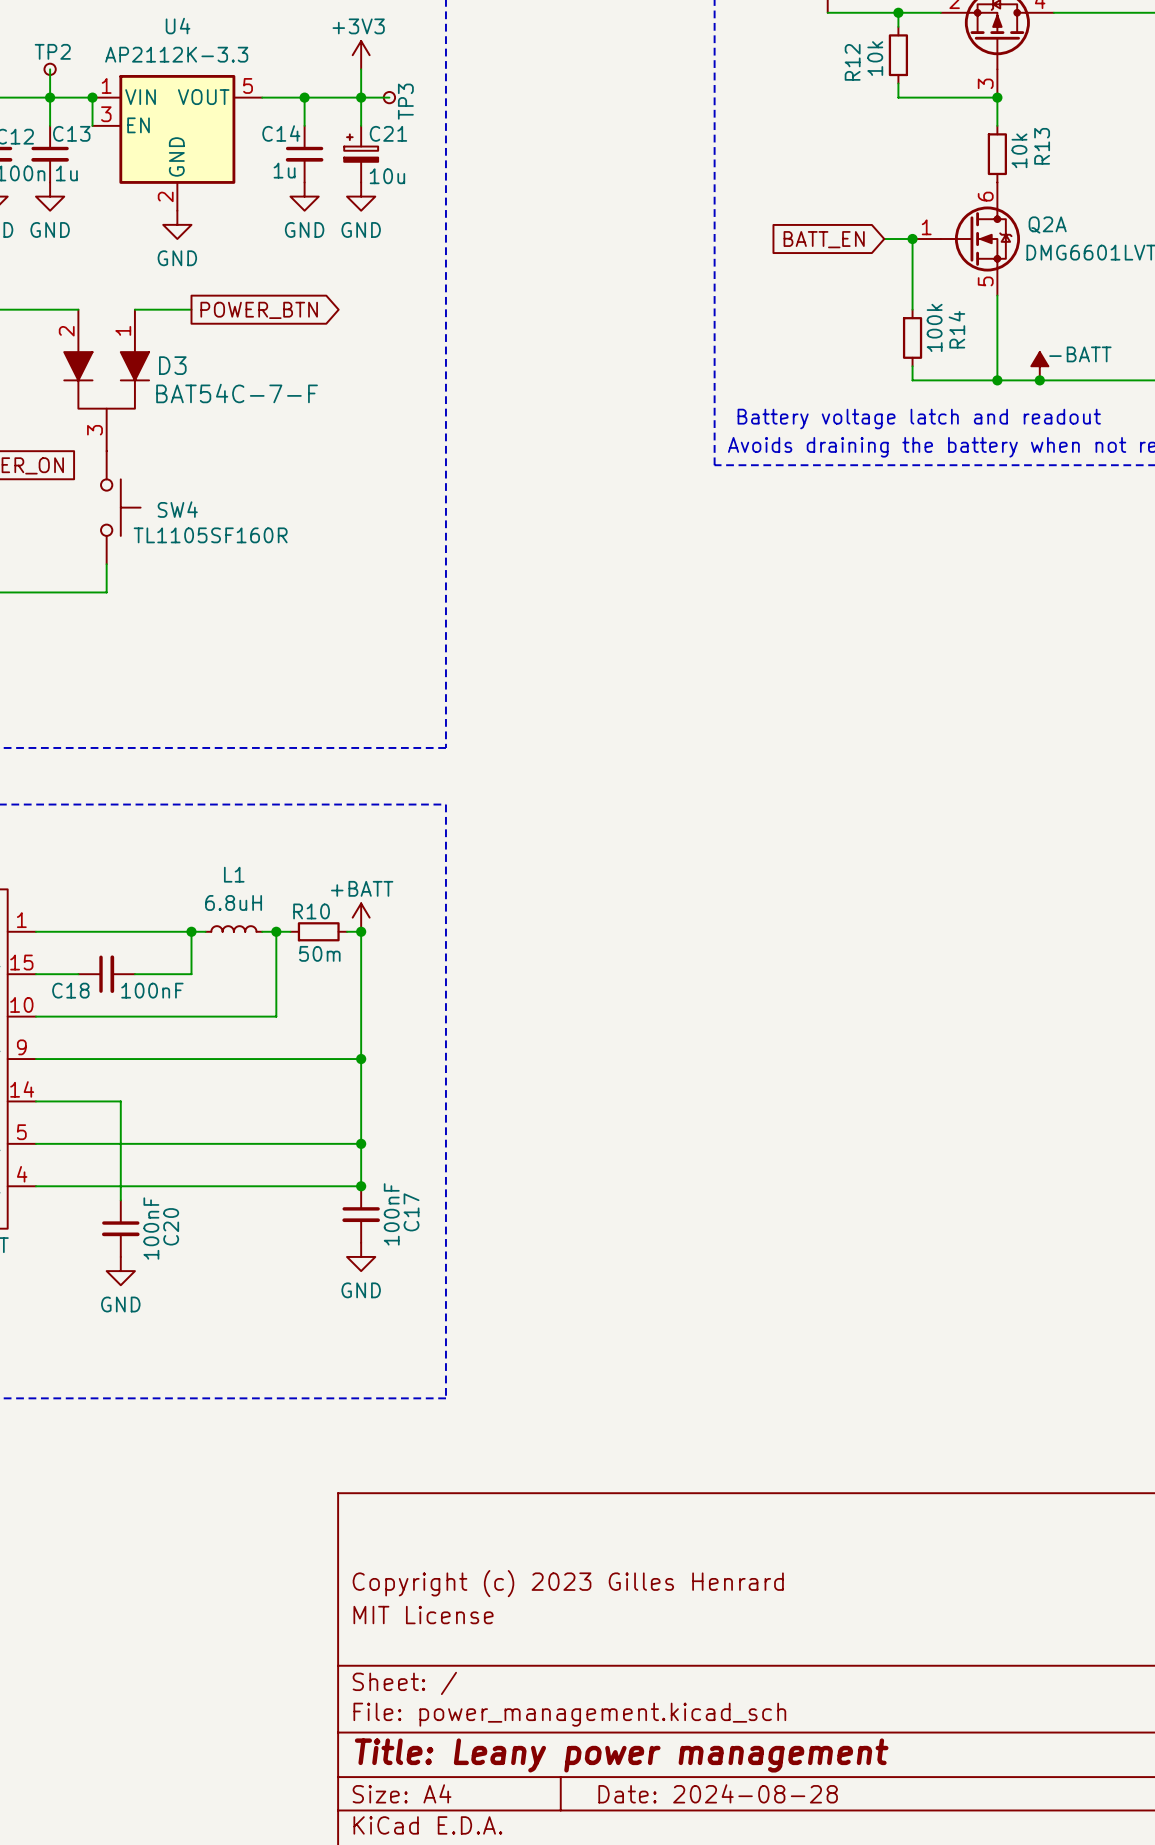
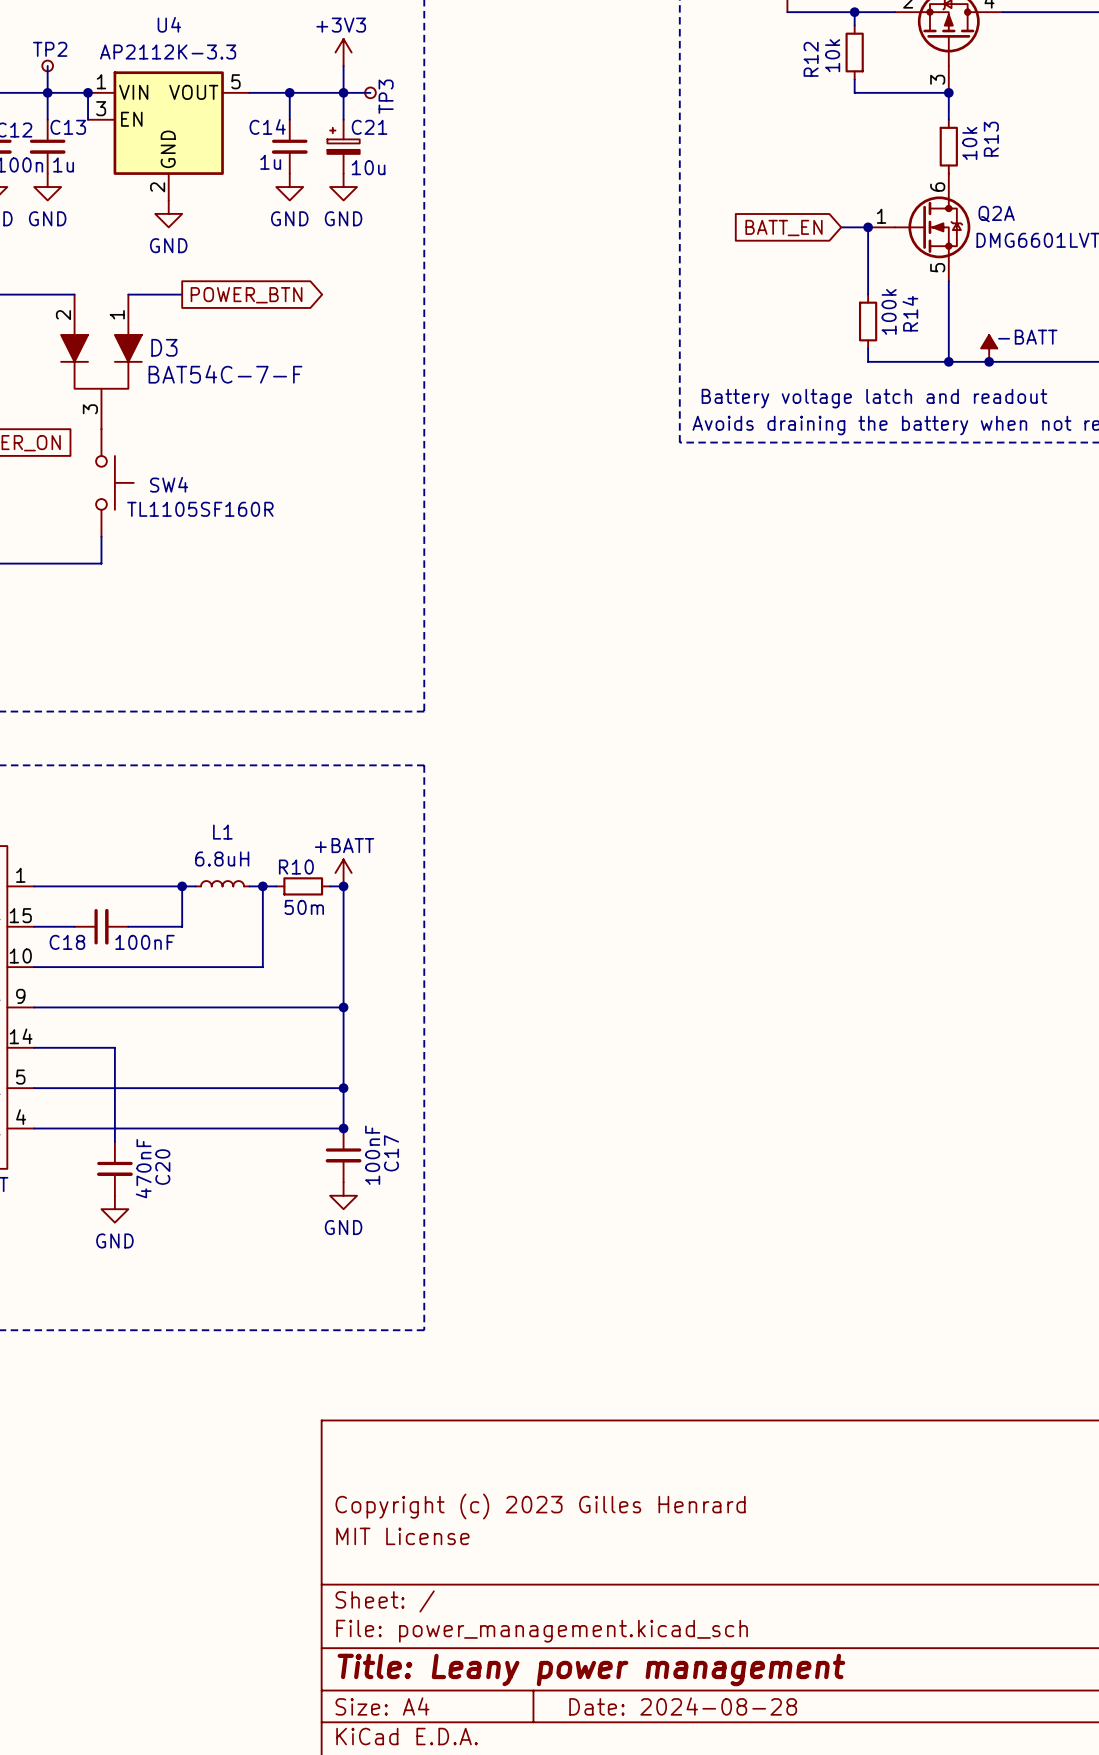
C20 value: 100nF (151, 1228) -> 470nF (143, 1168)

